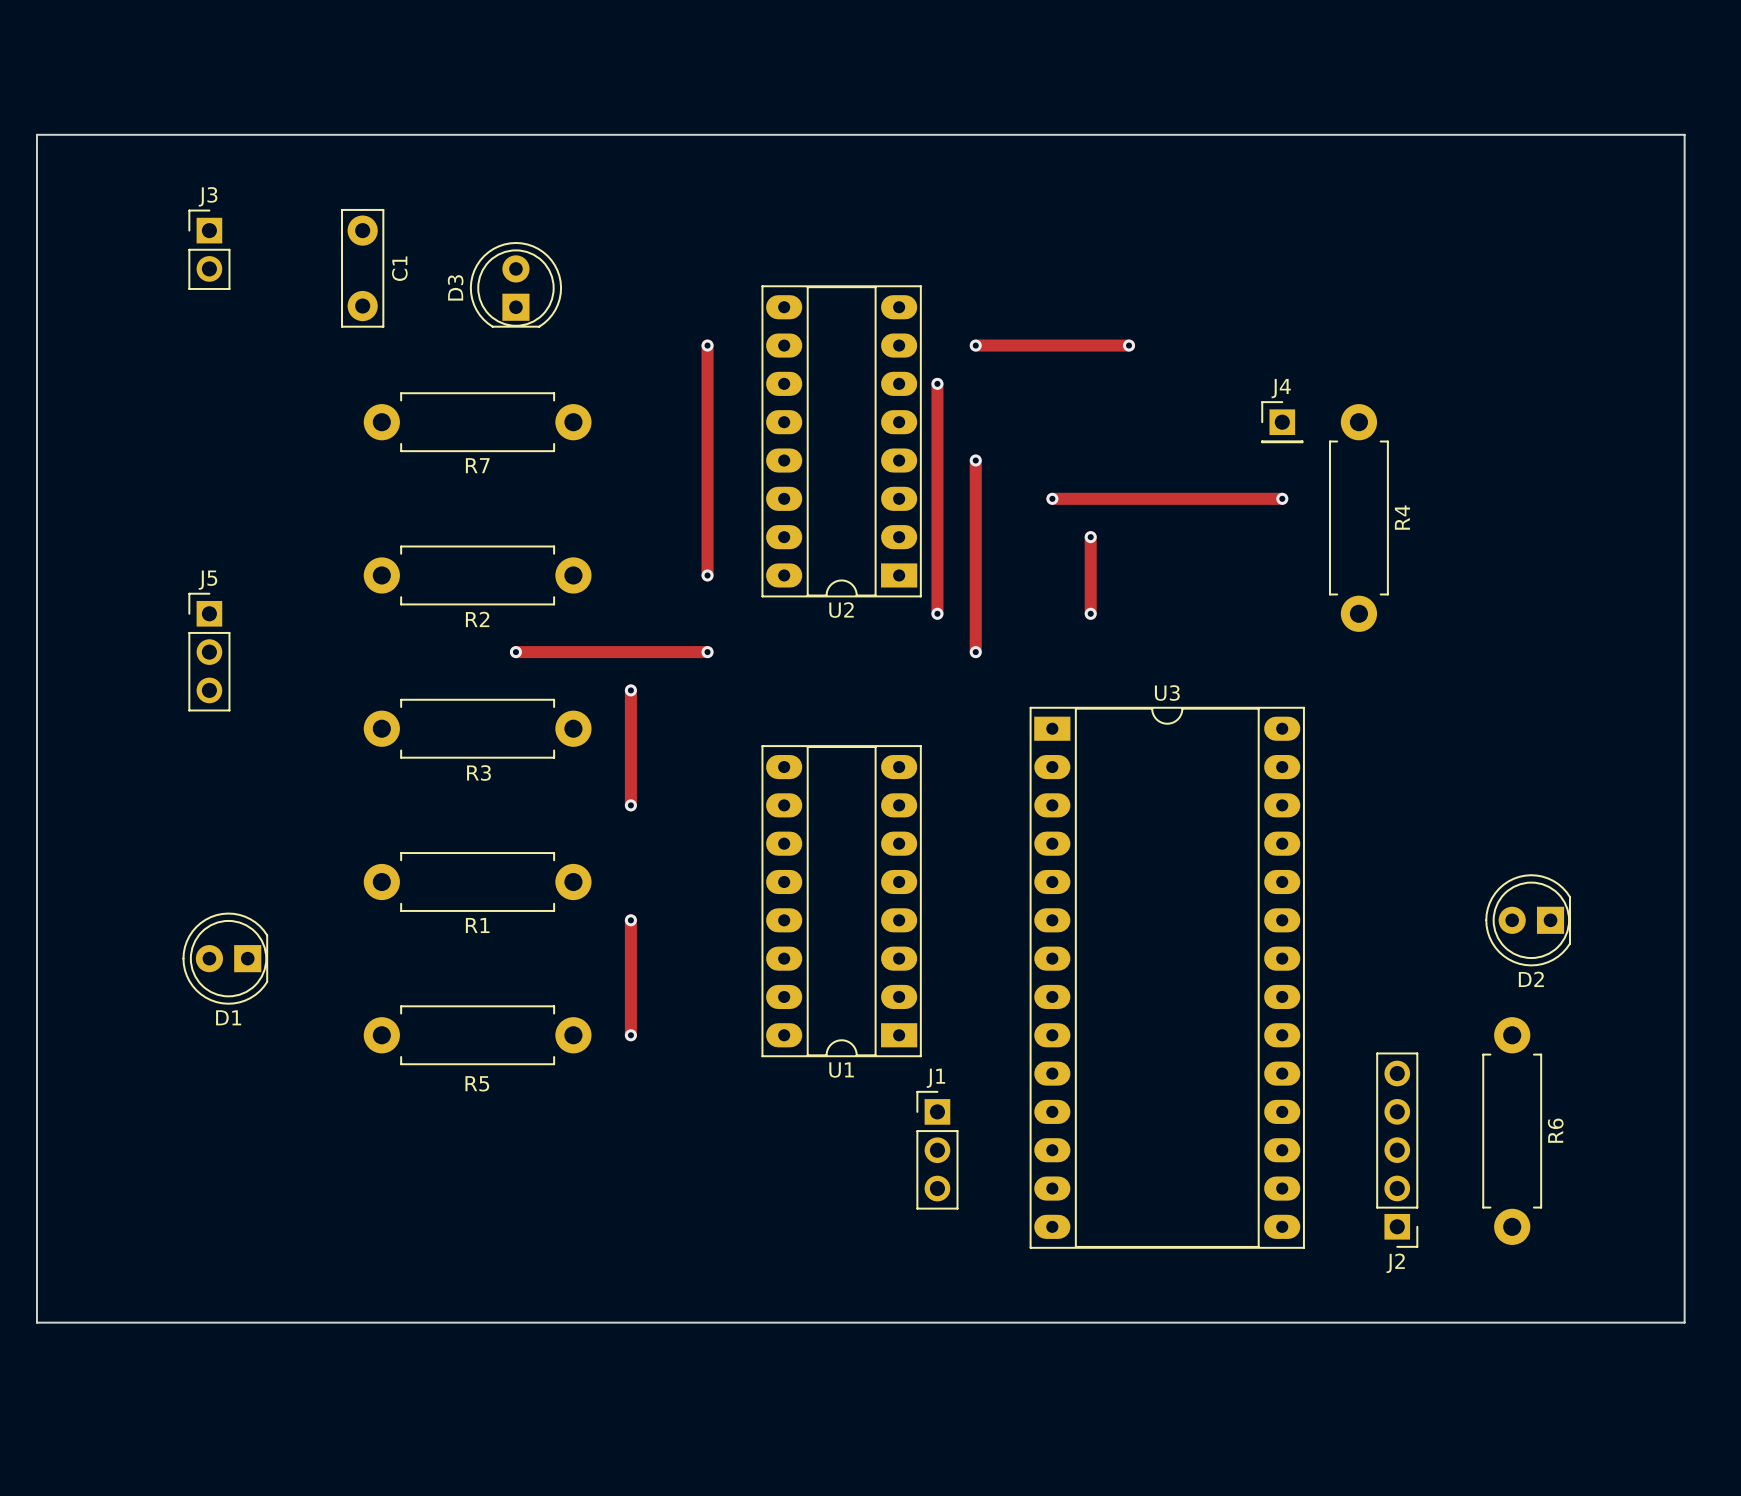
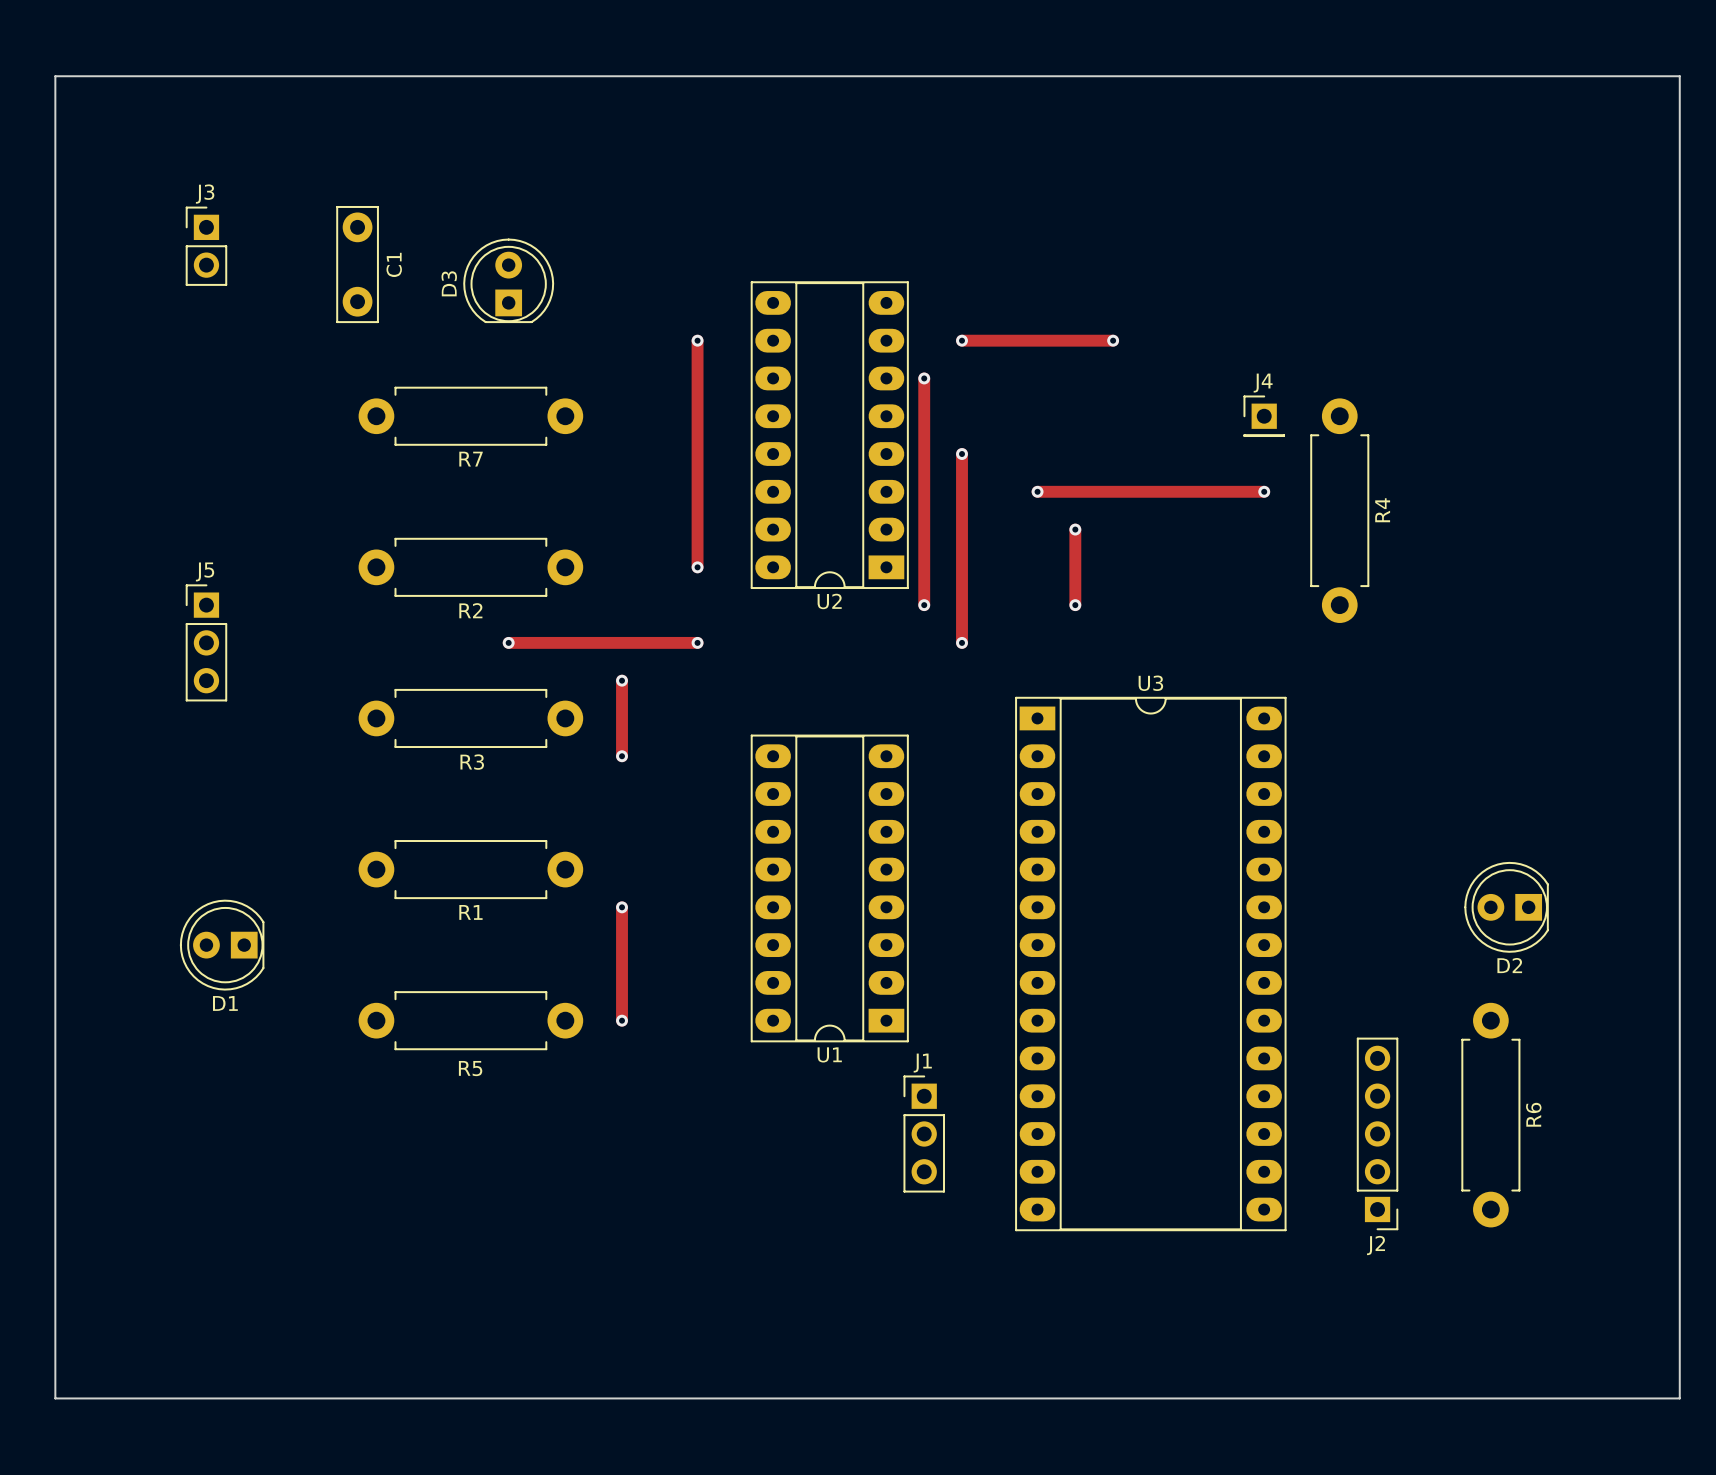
board edge: (36, 134) (1684, 134) (1684, 1322) (36, 1322) (36, 134) -> (55, 76) (55, 1398) (1679, 1398) (1679, 76) (55, 76)
track: (630, 767) (630, 805) -> none
via position: (630, 805) -> (622, 756)

